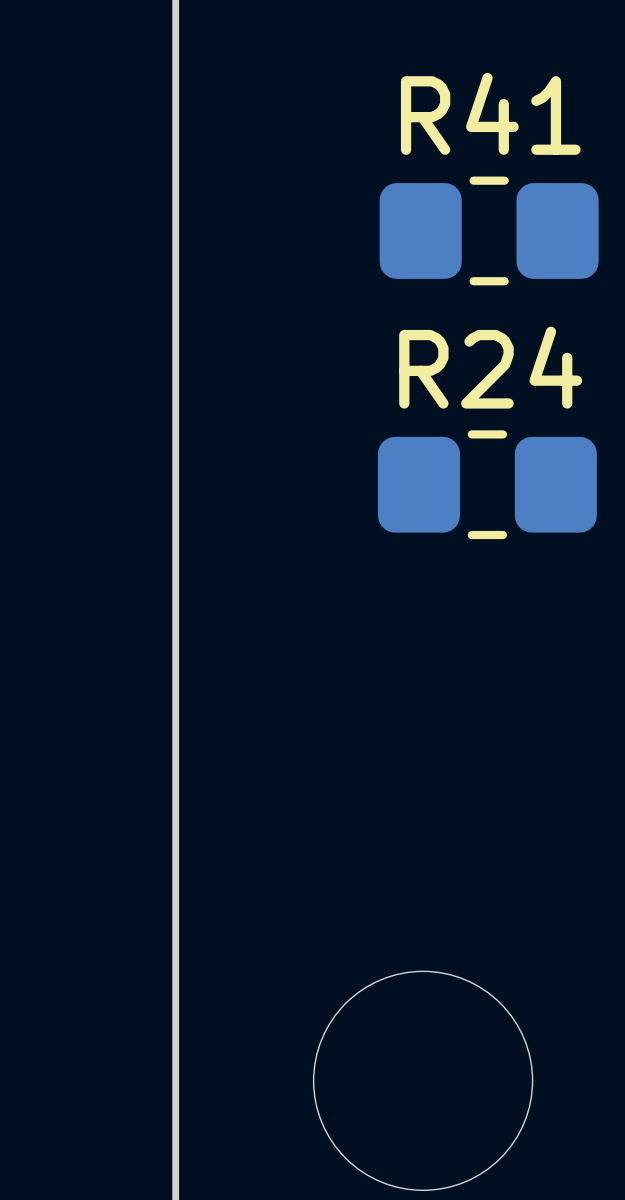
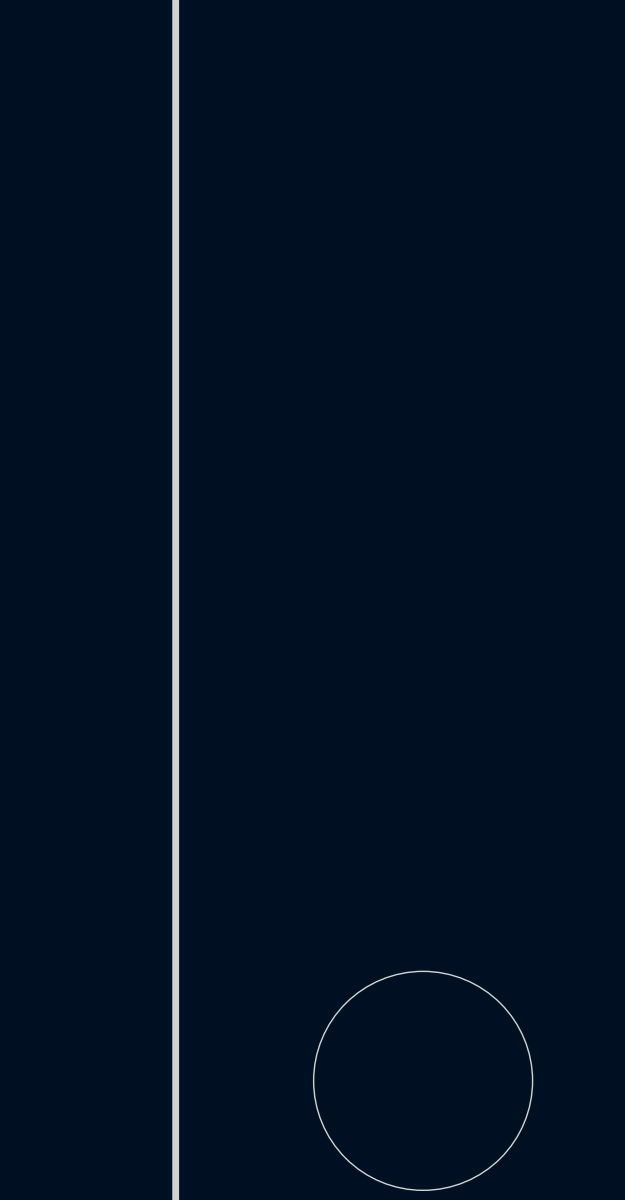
R41: (489, 230) -> none
R24: (487, 484) -> none

